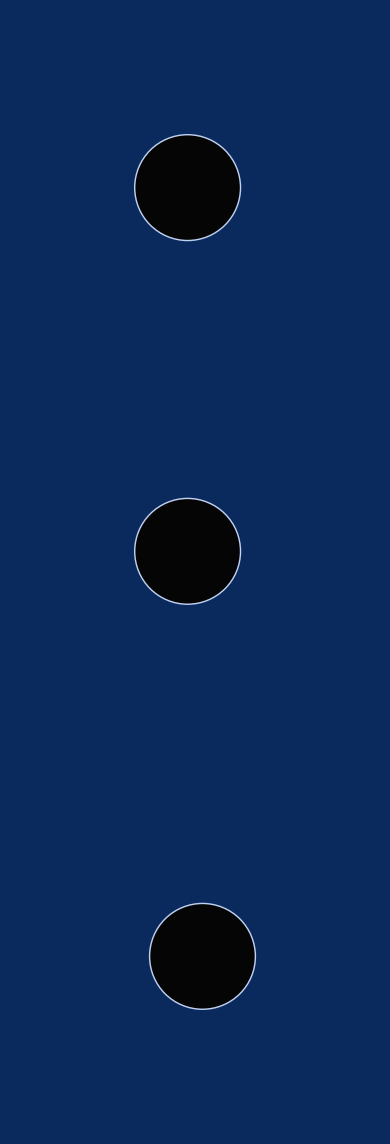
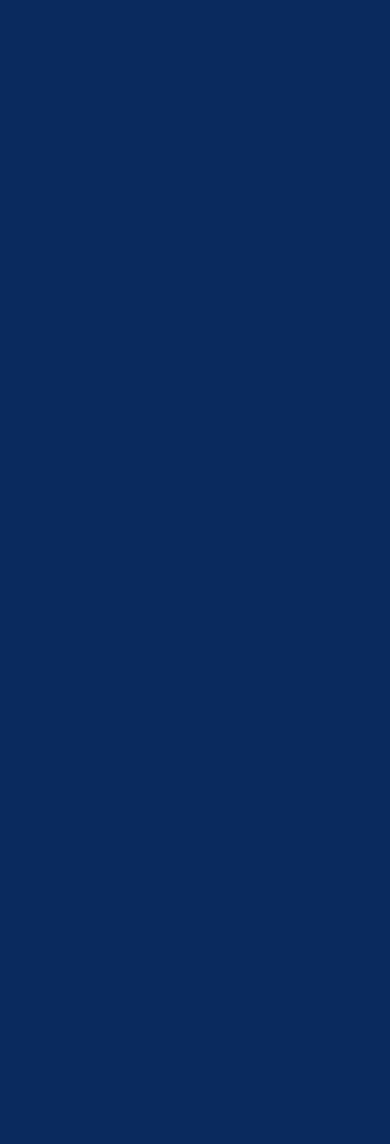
part: (187, 187) -> none
part: (187, 551) -> none
part: (202, 956) -> none

